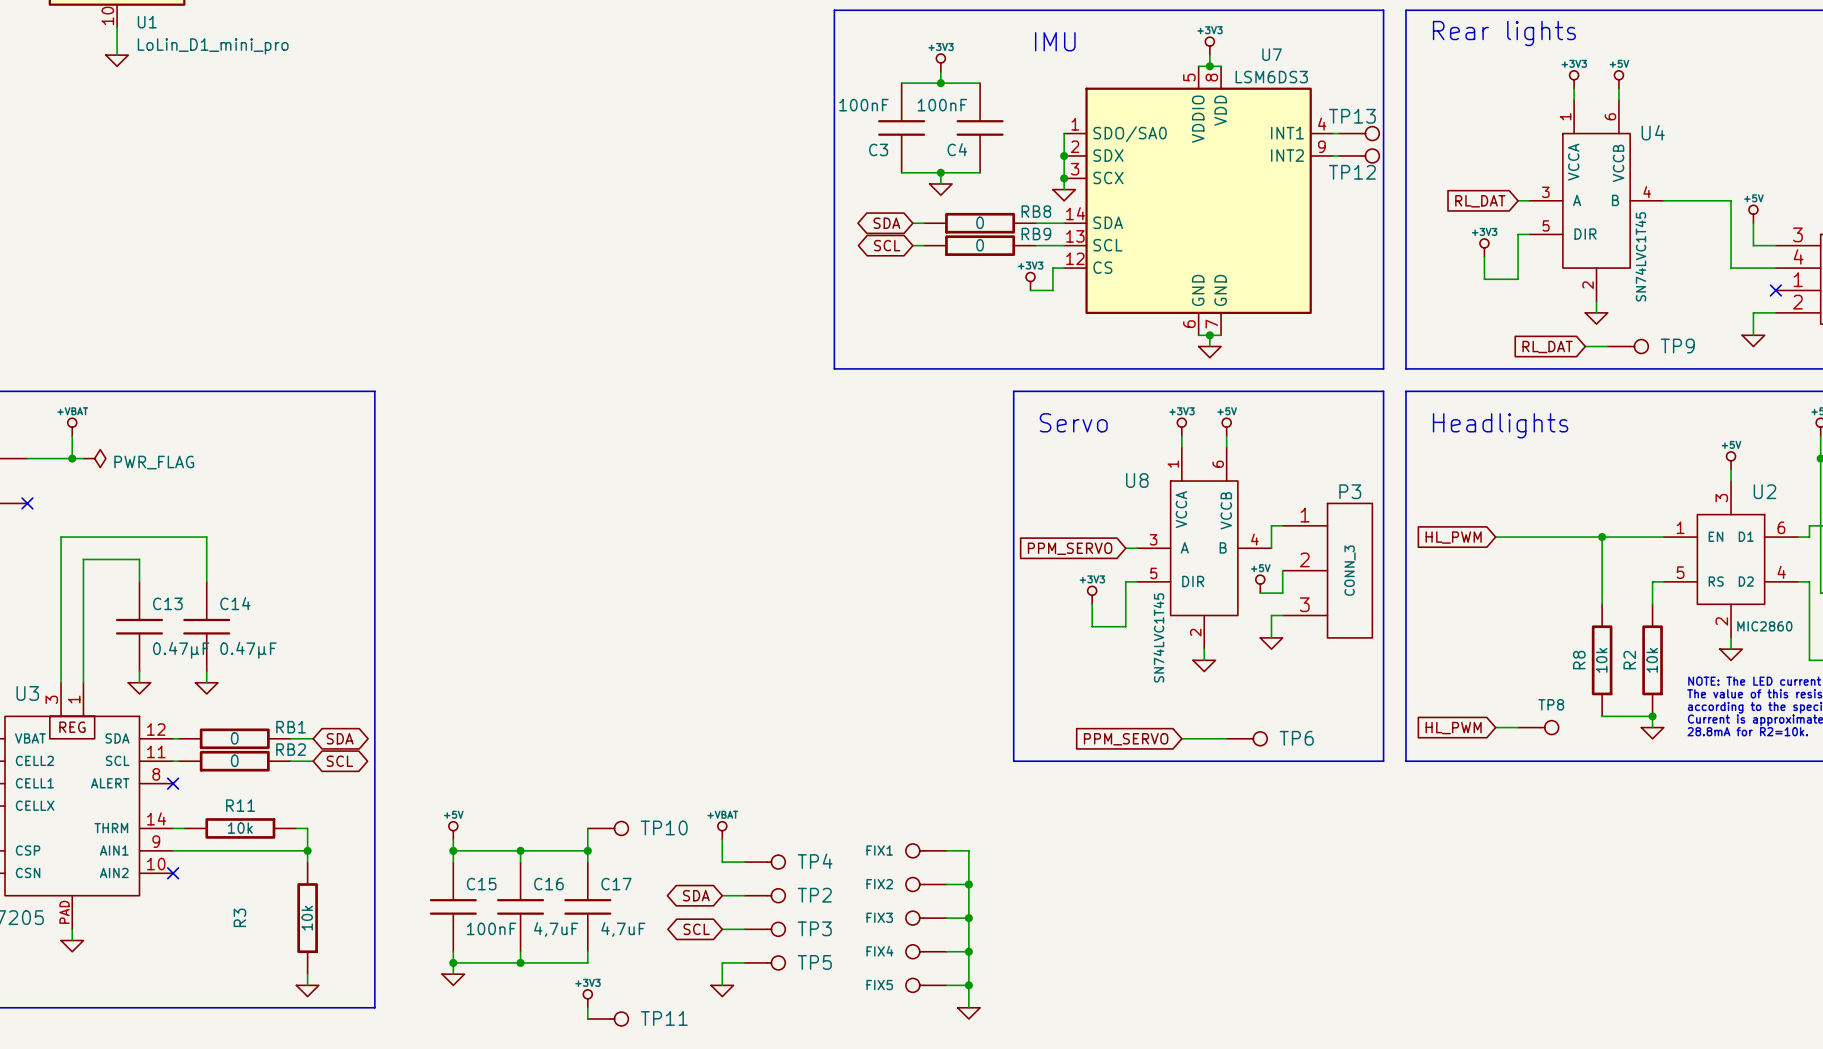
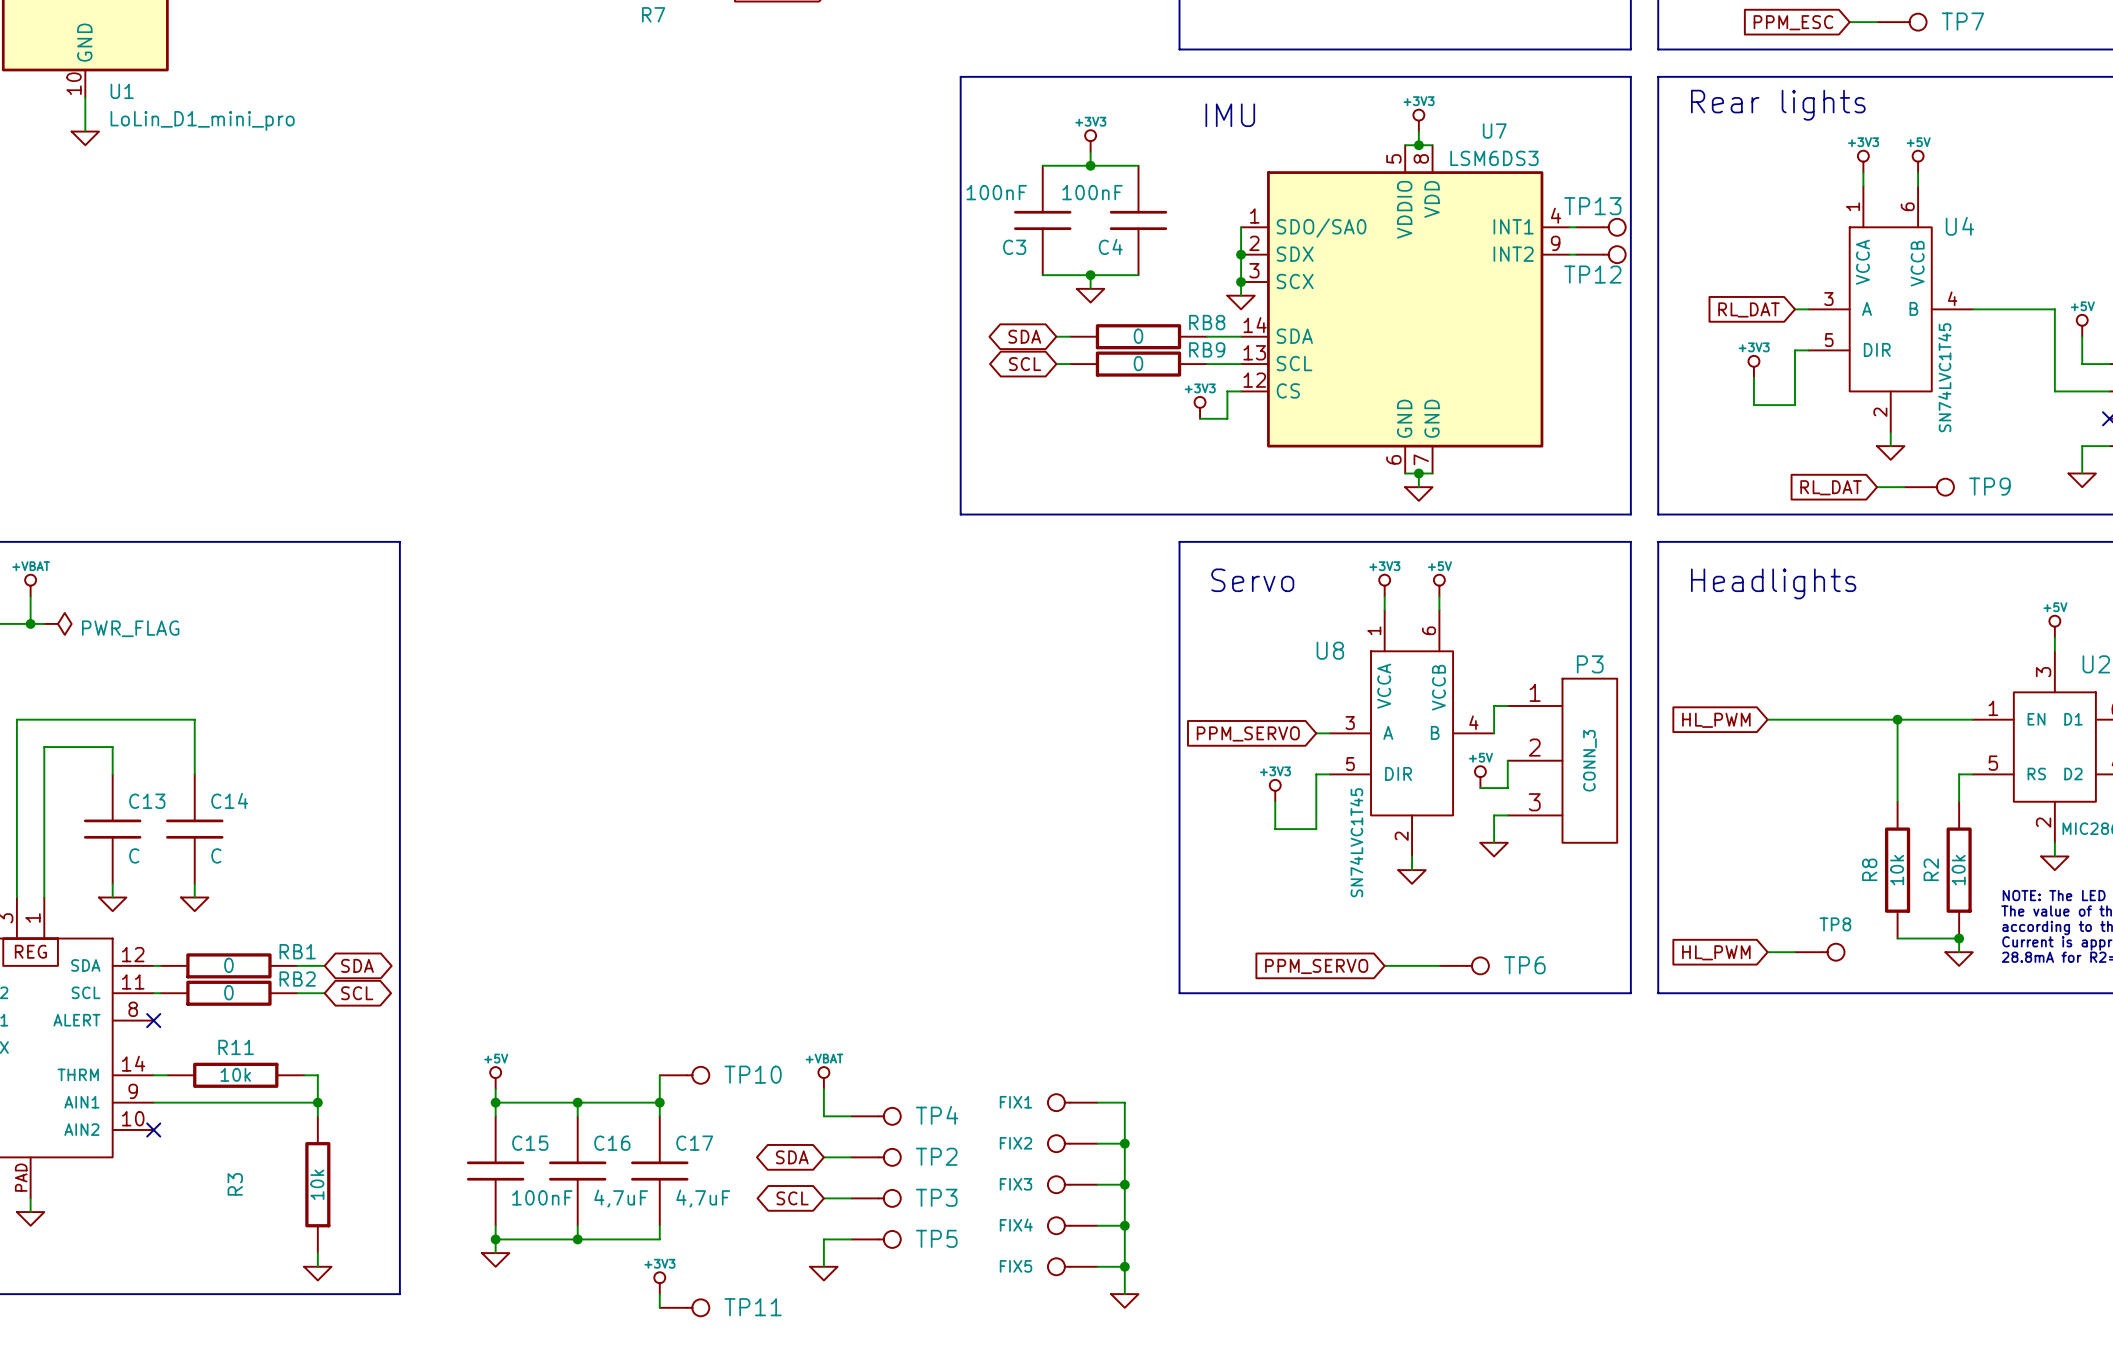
C13 value: 0.47µF (181, 650) -> C (134, 855)
C14 value: 0.47µF (248, 650) -> C (216, 855)

